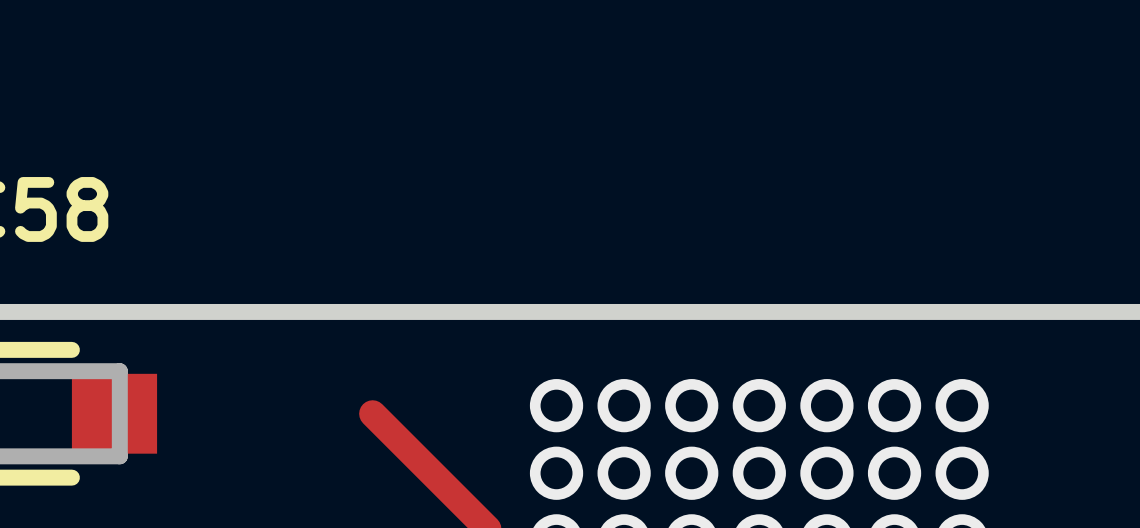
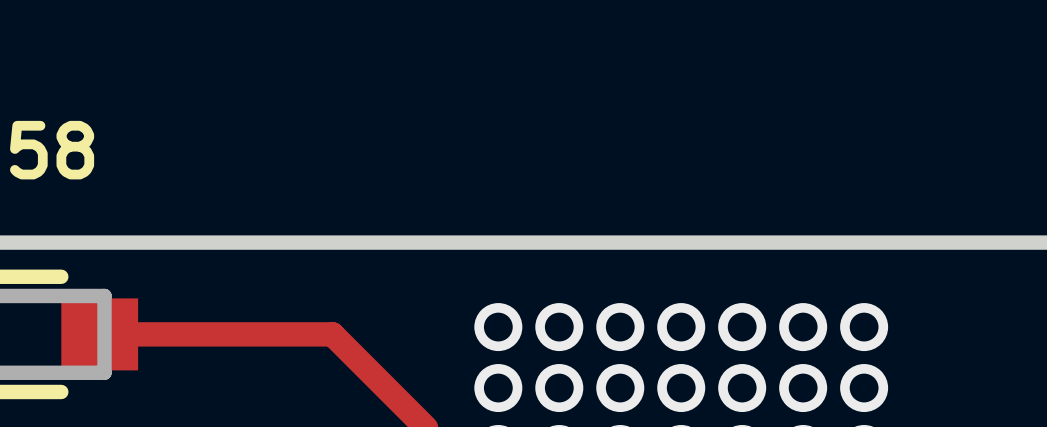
track: none -> (100, 334) (332, 334)

